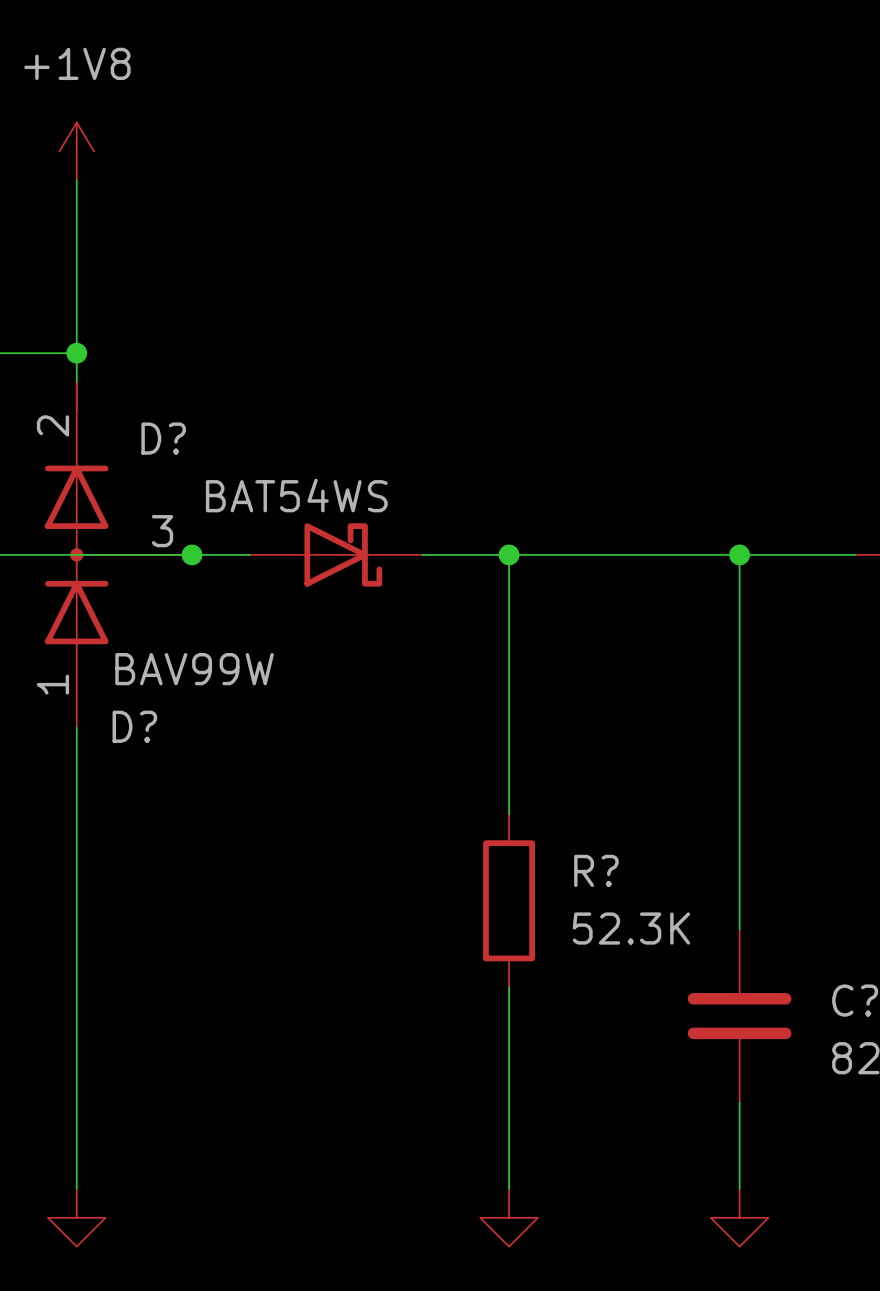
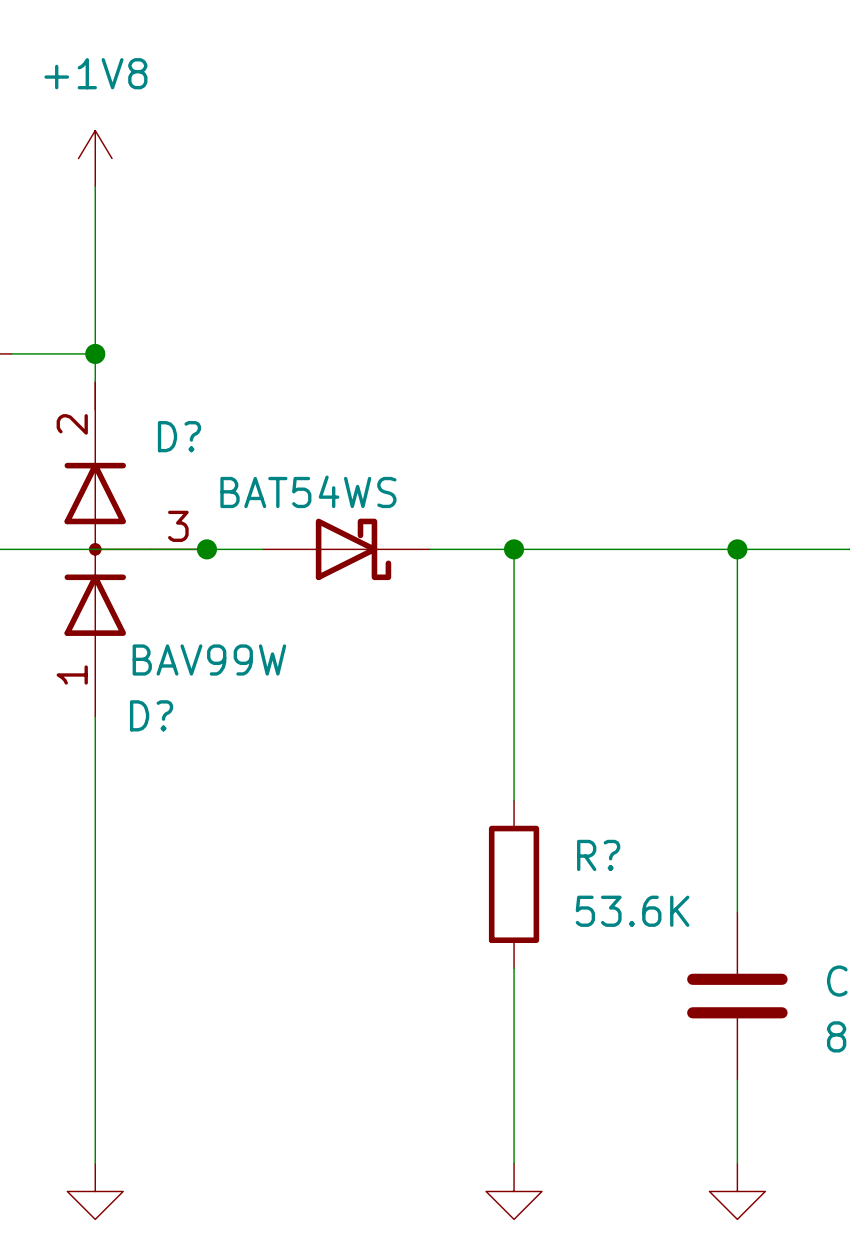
R? value: 52.3K (631, 928) -> 53.6K (632, 911)

